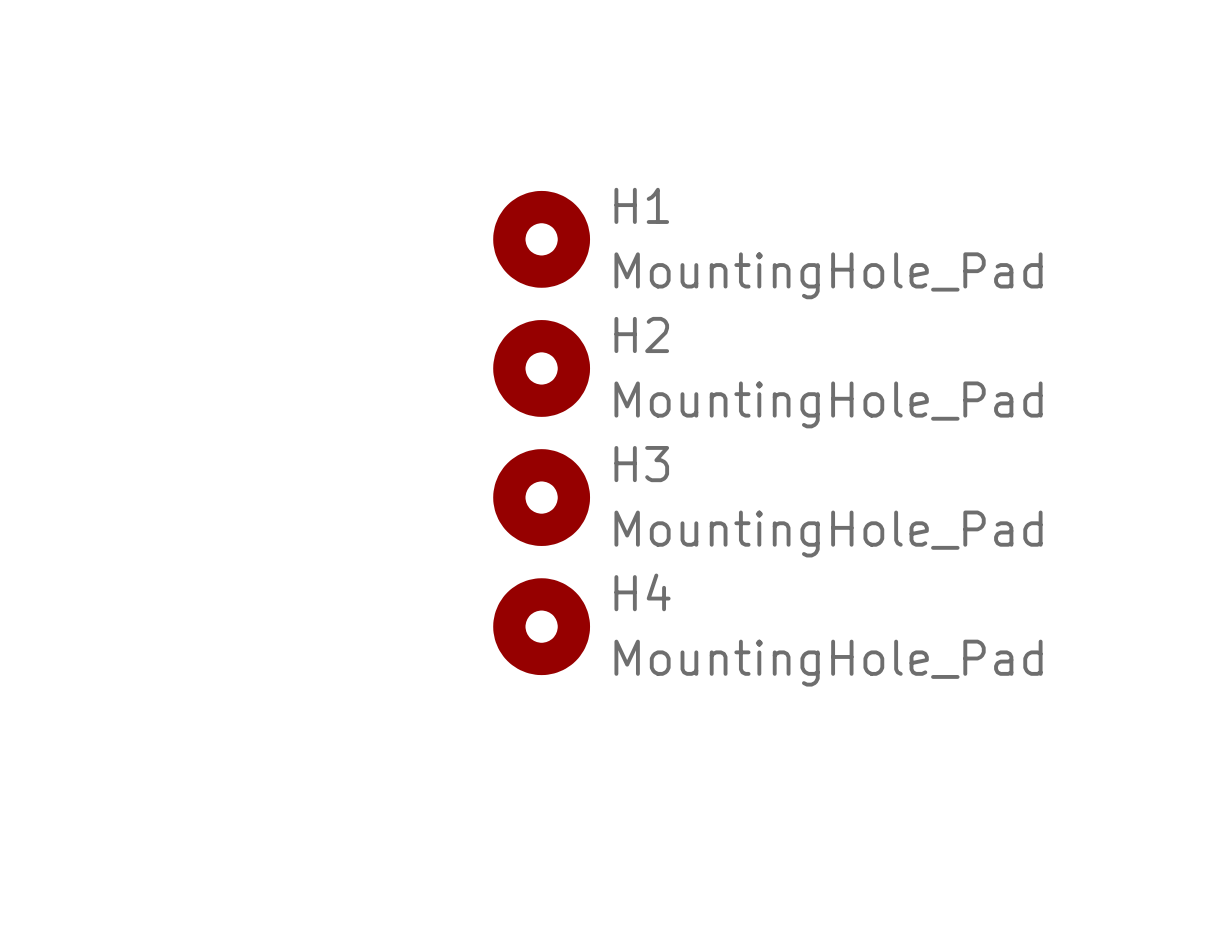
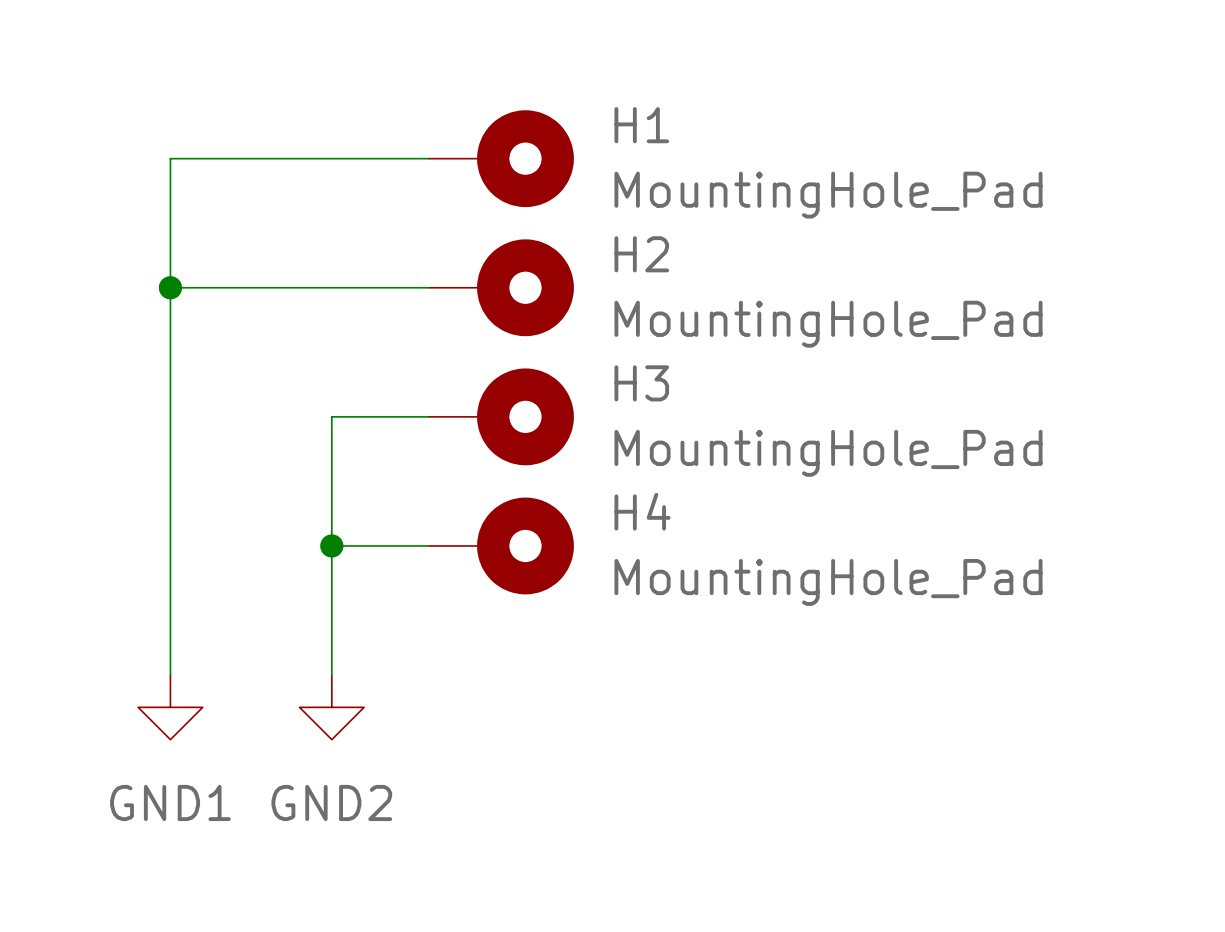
wire: none -> (428, 158) (170, 158) (170, 675)
H1 symbol: [493, 190, 591, 288] -> [428, 110, 574, 208]
wire: none -> (170, 287) (428, 287)
junction: none -> (170, 287)
H2 symbol: [493, 320, 591, 417] -> [428, 239, 574, 337]
wire: none -> (428, 416) (331, 416) (331, 675)
H3 symbol: [493, 449, 591, 546] -> [428, 368, 574, 466]
wire: none -> (331, 545) (428, 545)
junction: none -> (331, 545)
H4 symbol: [493, 578, 591, 676] -> [428, 497, 574, 595]
power symbol: none -> GND1 (170, 707)
power symbol: none -> GND2 (331, 707)

